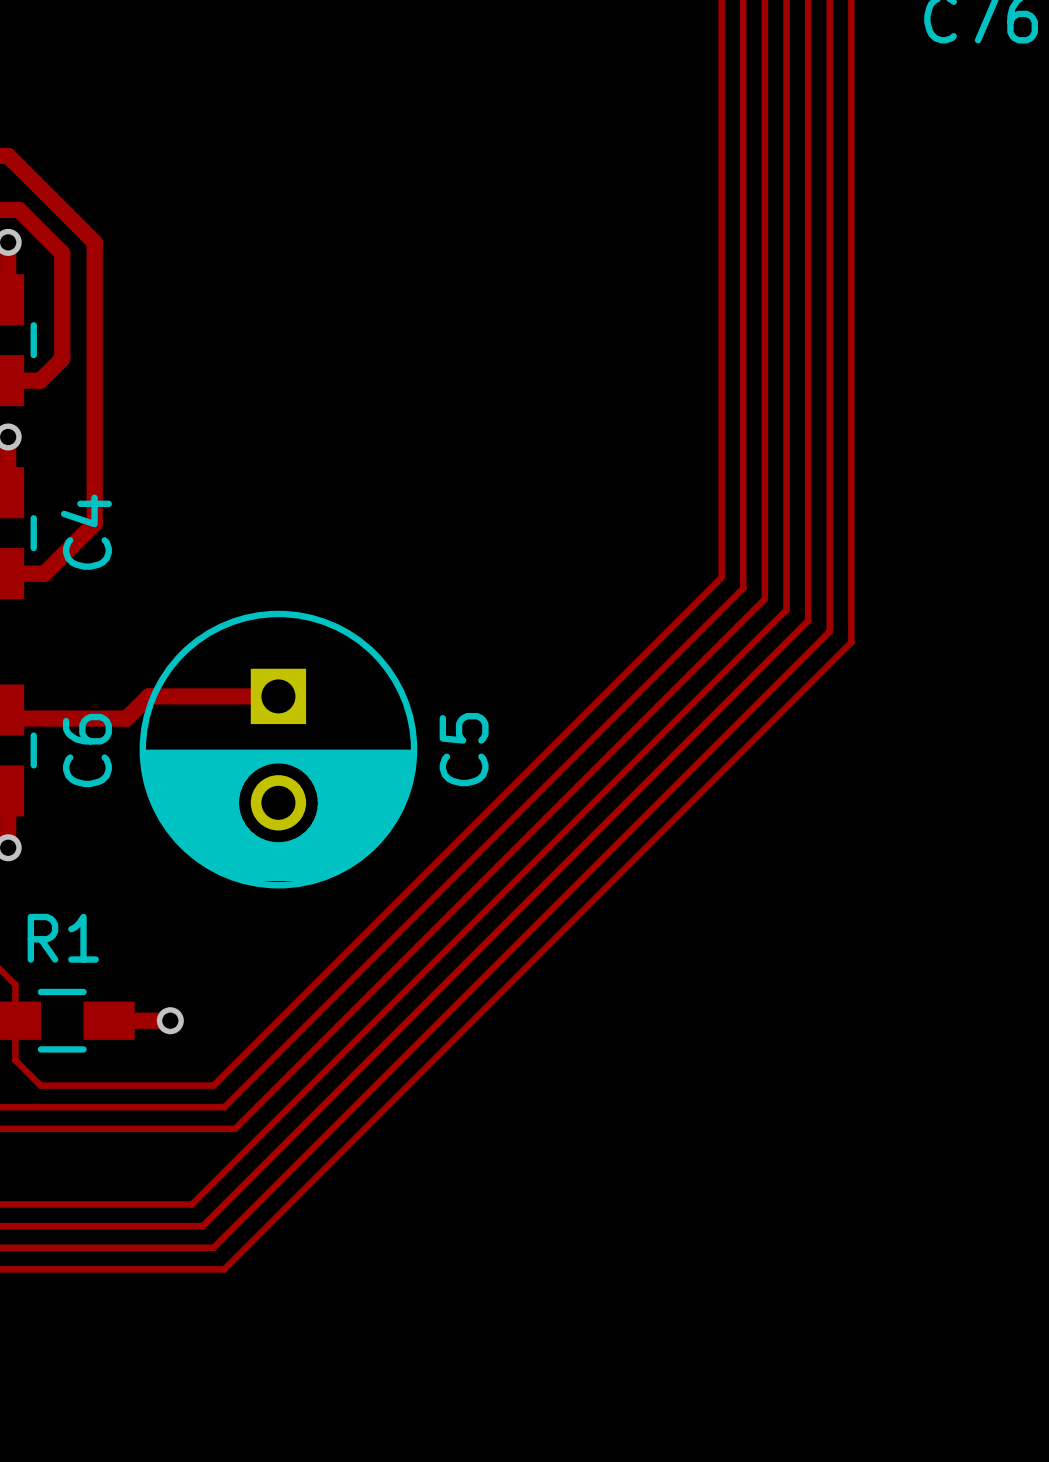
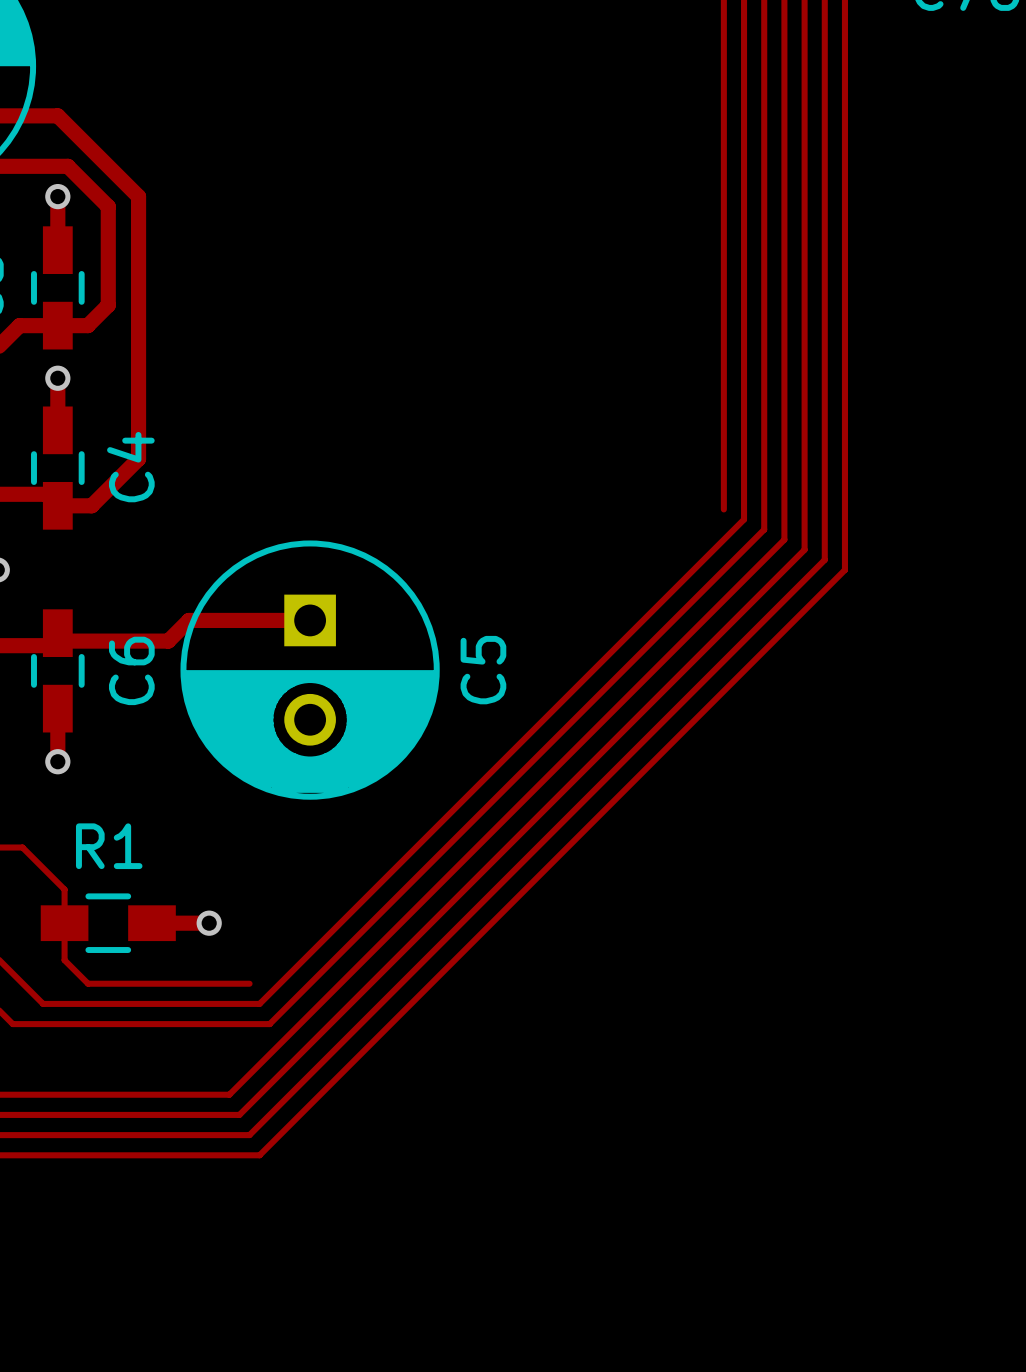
track: (721, 577) (213, 1085) -> none

